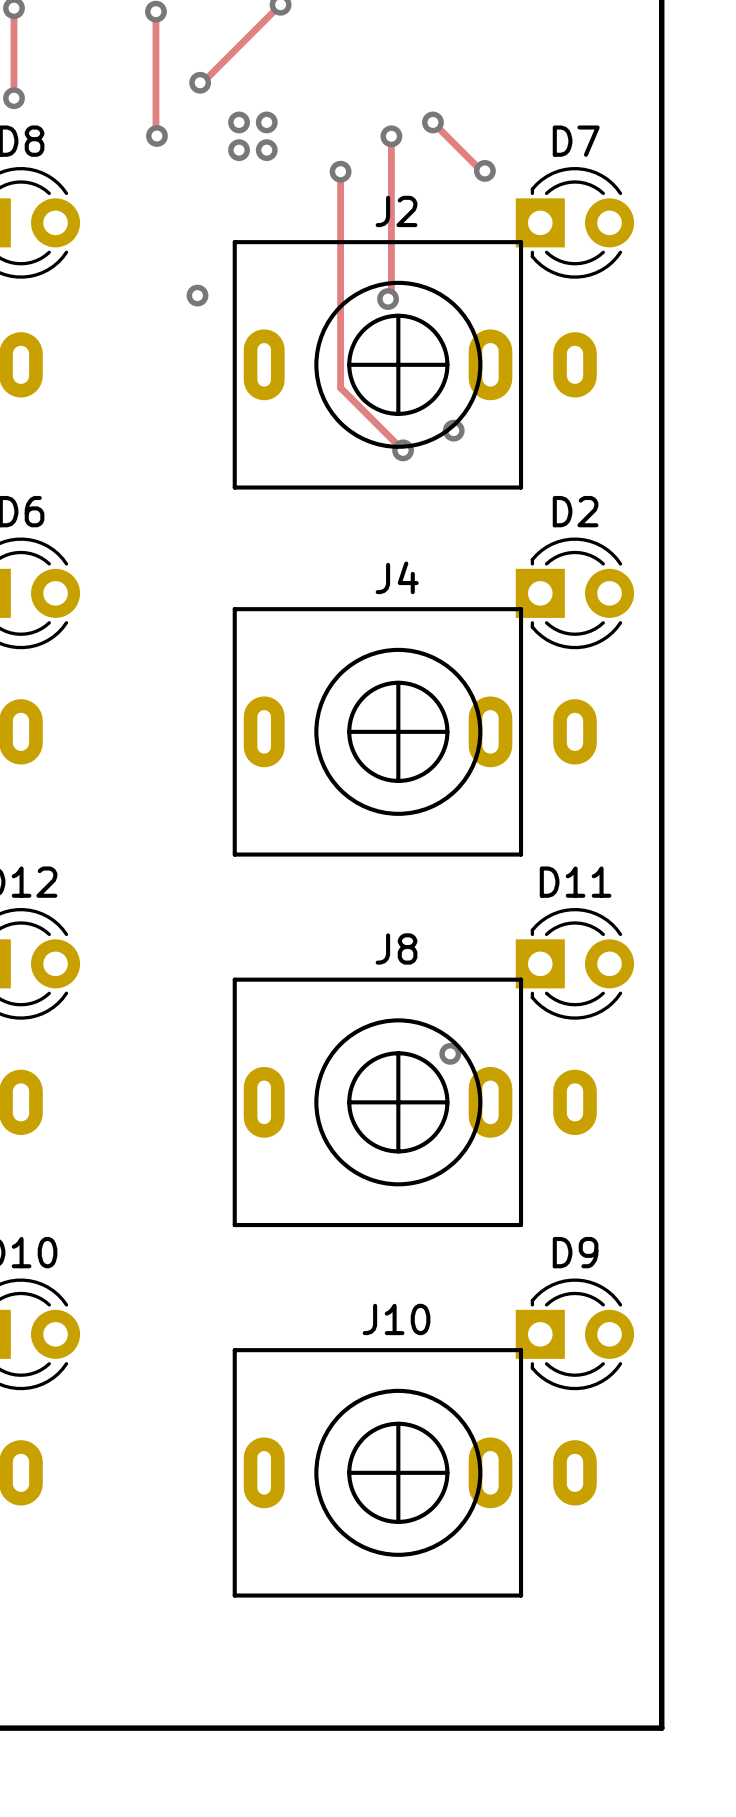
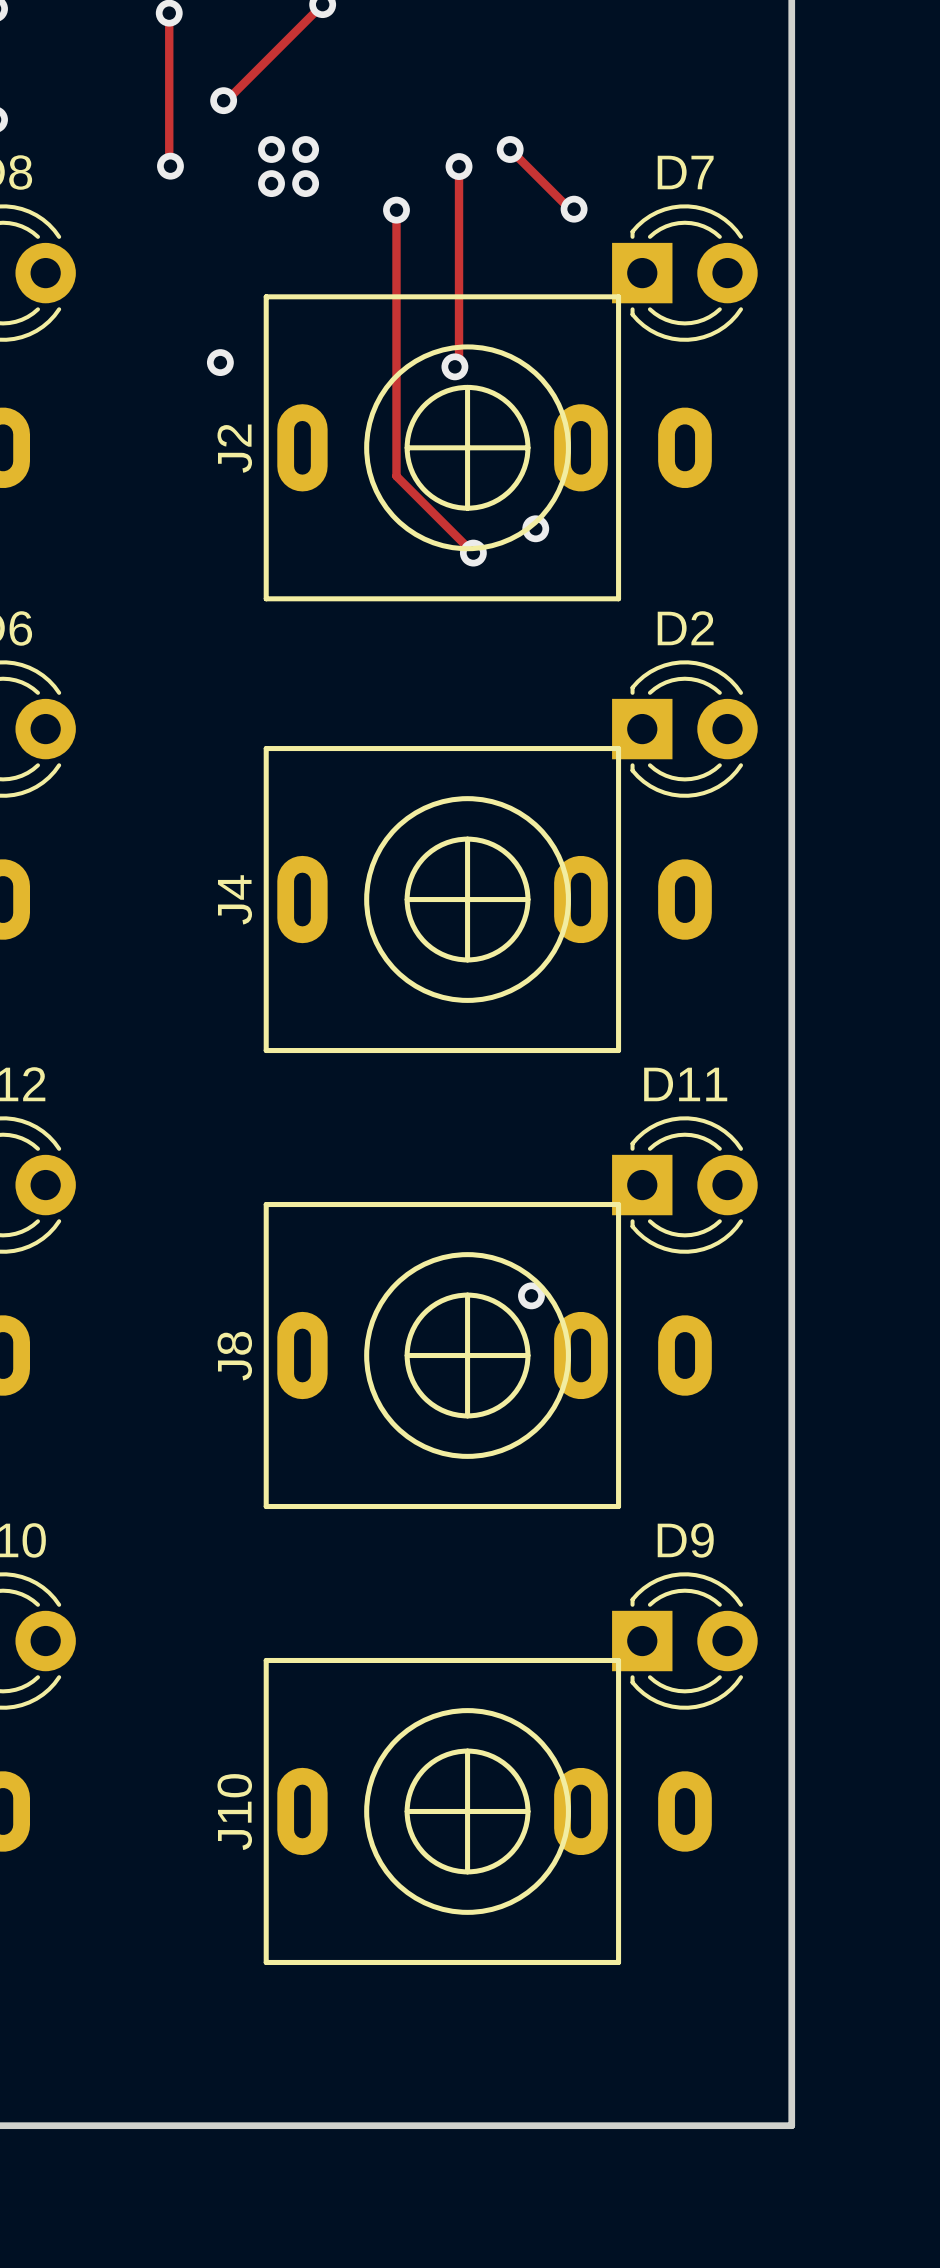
J2 name rotation: 0° (396, 211) -> 90° counterclockwise (234, 448)
J2 name position: J2 (396, 211) -> J2 (234, 448)
J4 name rotation: 0° (397, 577) -> 90° counterclockwise (235, 899)
J4 name position: J4 (397, 577) -> J4 (235, 899)
J8 name rotation: 0° (396, 948) -> 90° counterclockwise (234, 1356)
J8 name position: J8 (396, 948) -> J8 (234, 1356)
J10 name rotation: 0° (396, 1319) -> 90° counterclockwise (234, 1812)
J10 name position: J10 (396, 1319) -> J10 (234, 1812)

